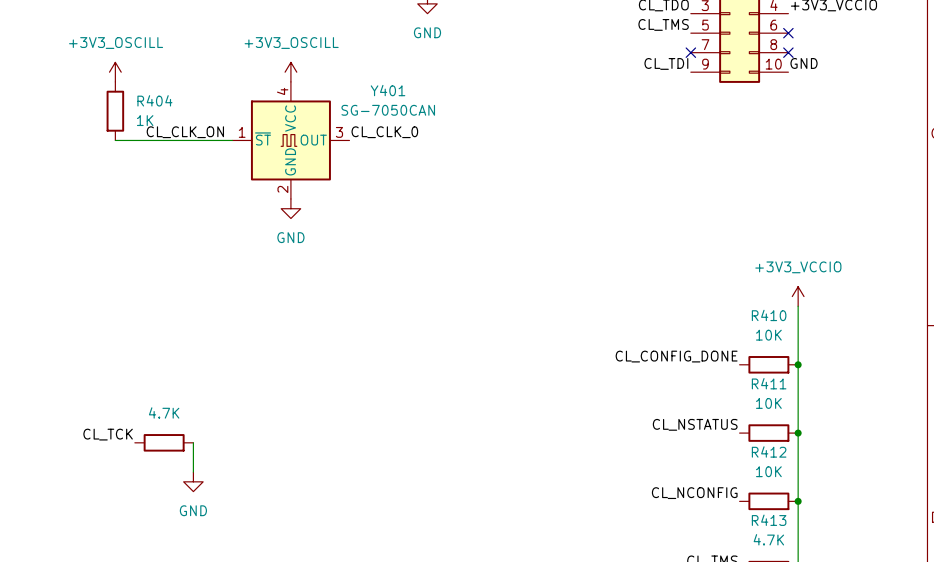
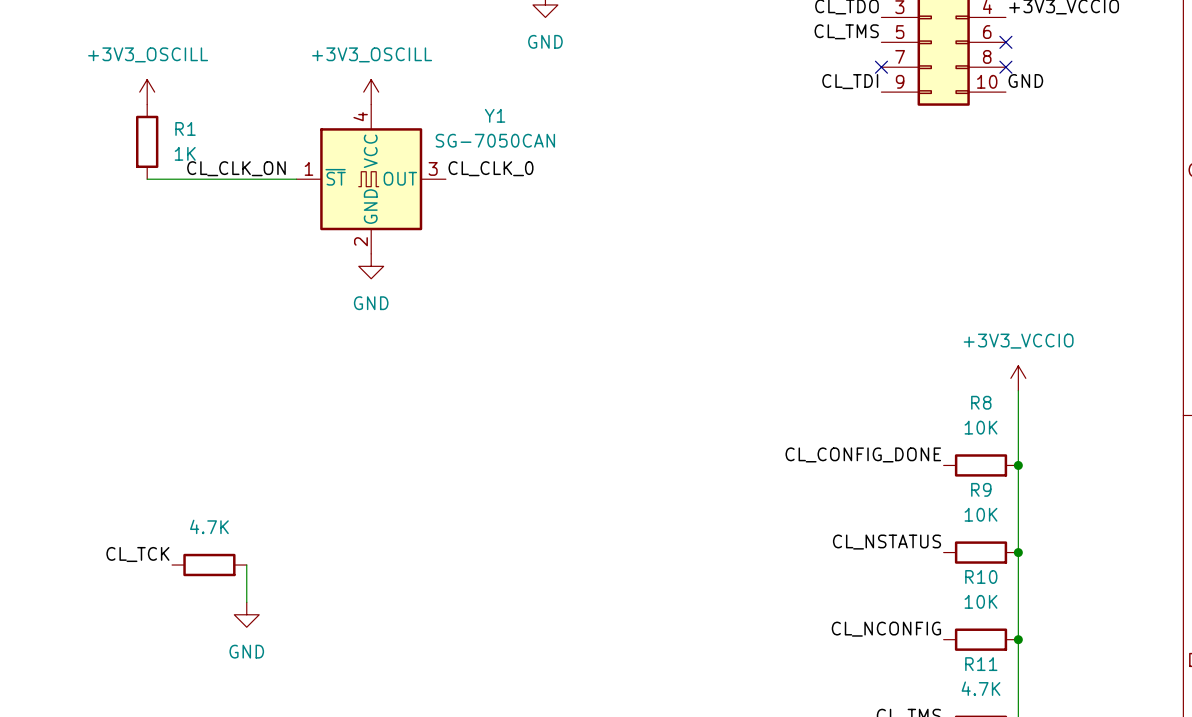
Y401 name: Y401 (388, 90) -> Y1 (495, 115)
R404 name: R404 (154, 100) -> R1 (185, 128)
R410 name: R410 (769, 315) -> R8 (981, 402)
R411 name: R411 (769, 383) -> R9 (981, 489)
R412 name: R412 (769, 451) -> R10 (981, 576)
R413 name: R413 (769, 520) -> R11 (981, 664)

